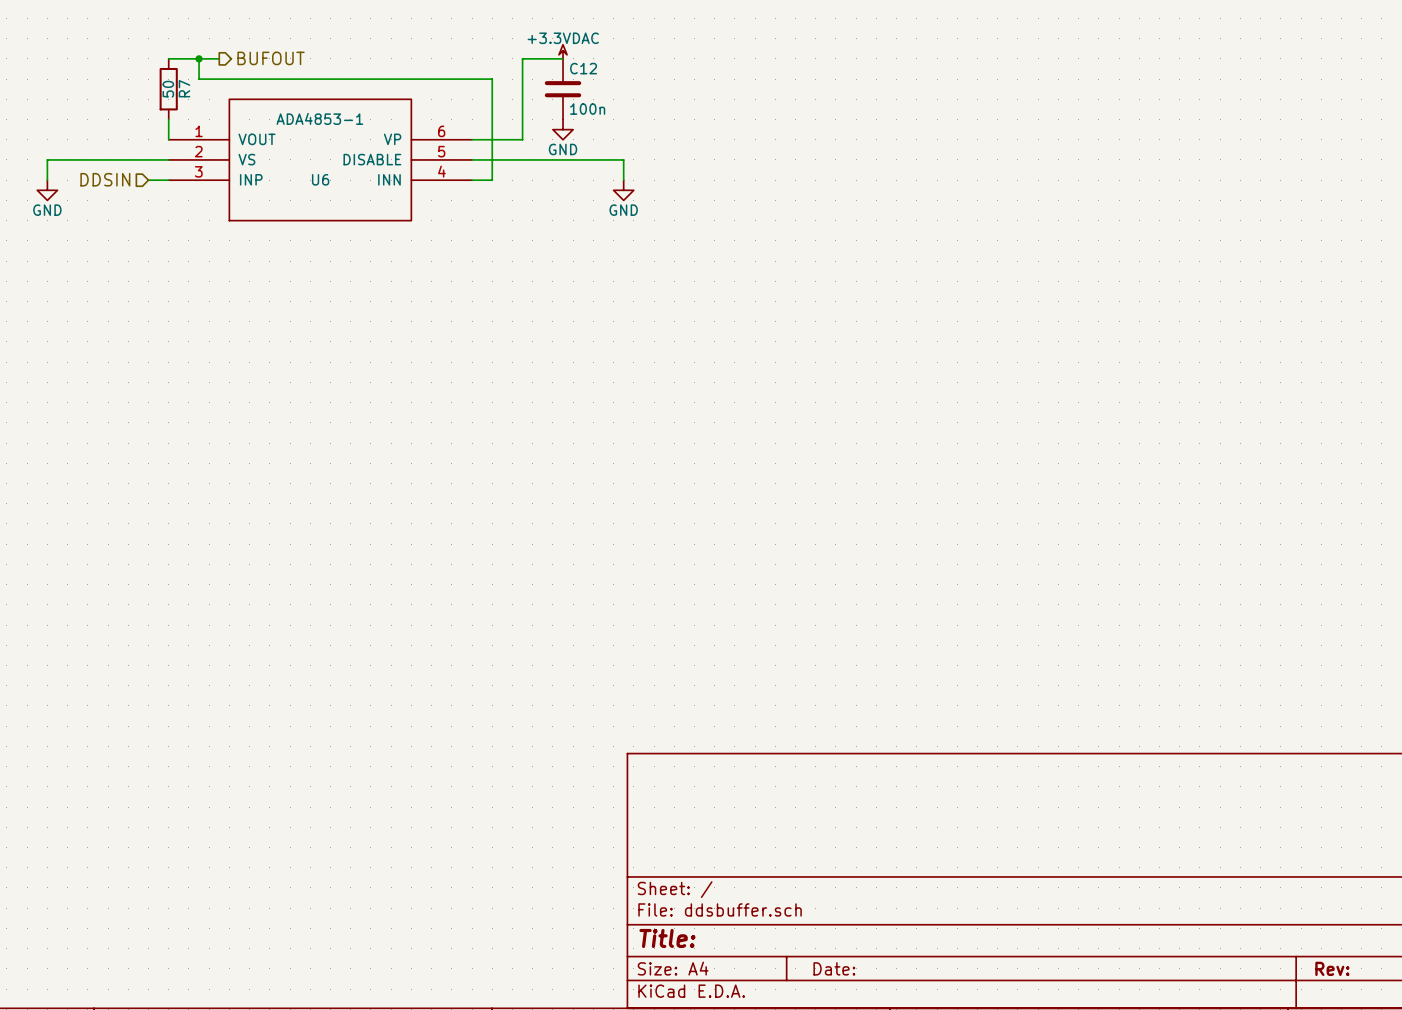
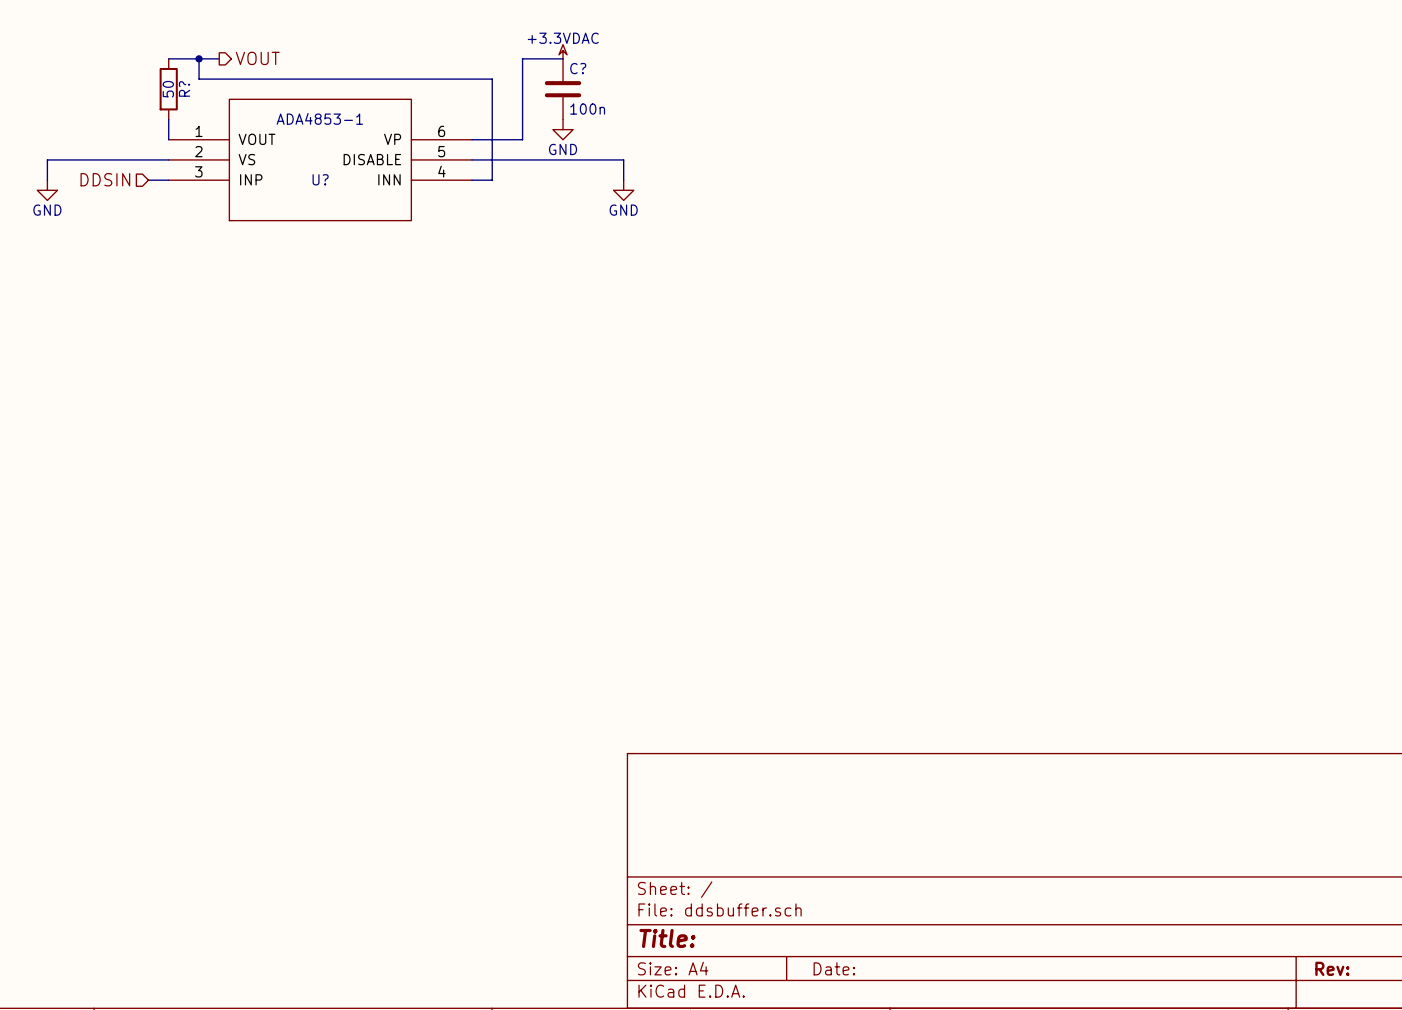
hierarchical label: BUFOUT (271, 58) -> VOUT (257, 58)
C12 name: C12 (583, 68) -> C? (578, 68)
R7 name: R7 (184, 88) -> R? (184, 88)
U6 name: U6 (320, 179) -> U? (320, 179)

